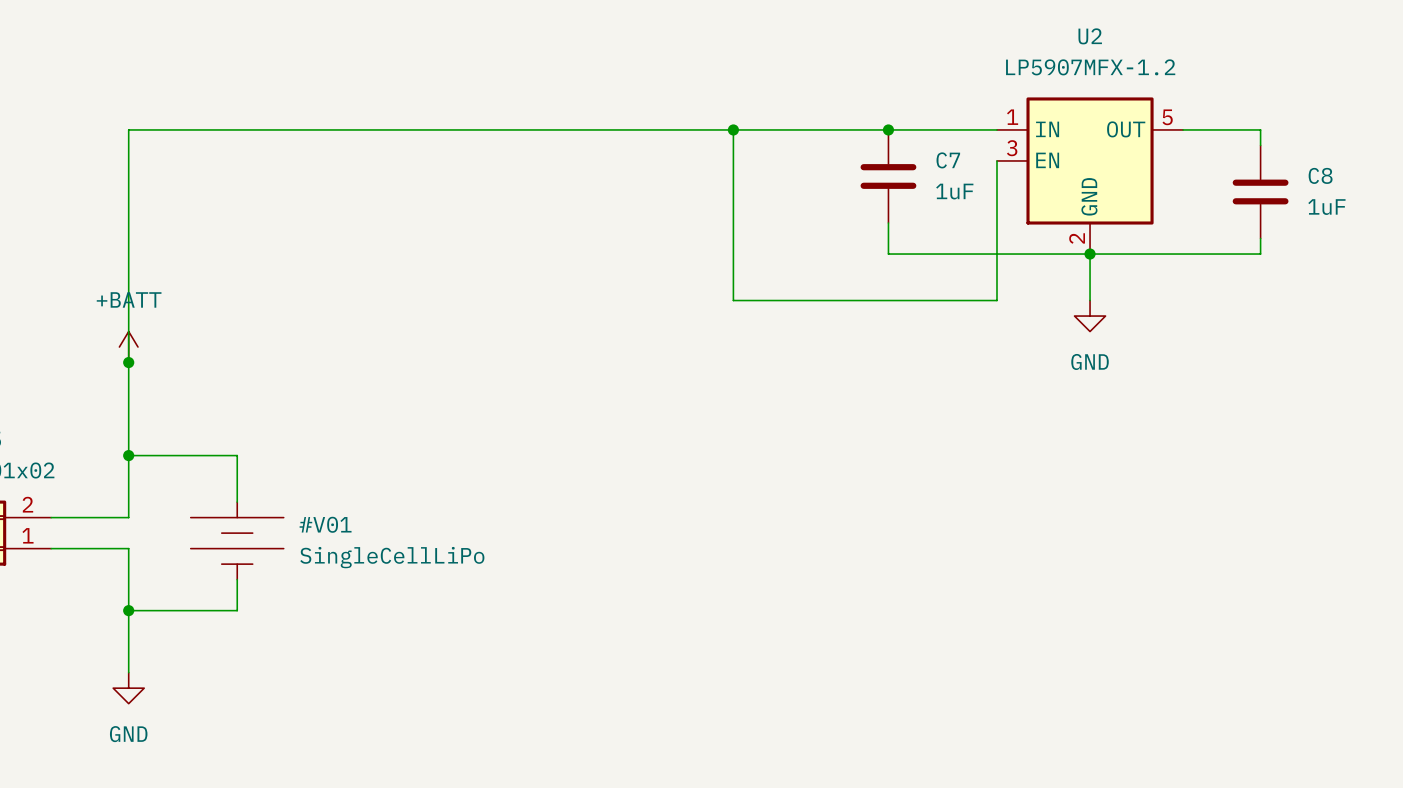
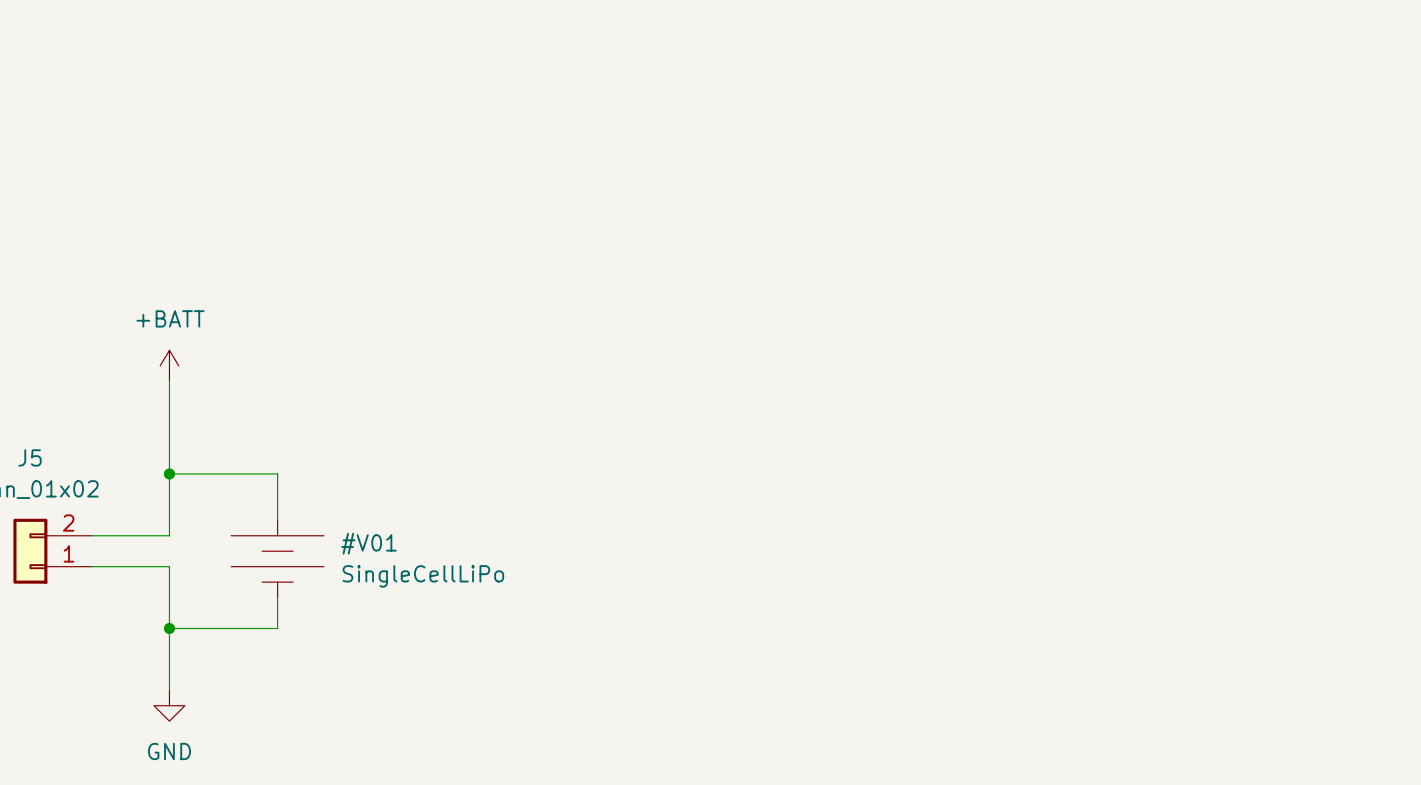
wire: (733, 129) (733, 300) (996, 300) (996, 160) -> none
junction: (733, 129) -> none
junction: (888, 129) -> none
wire: (996, 129) (128, 129) (128, 362) -> none
wire: (1183, 129) (1260, 129) (1260, 145) -> none
U2: LP5907MFX-1.2 (1090, 175) -> none
C7: 1uF (888, 176) -> none
C8: 1uF (1260, 191) -> none
wire: (888, 223) (888, 254) (1260, 254) (1260, 238) -> none
wire: (1090, 254) (1090, 300) -> none
junction: (1090, 254) -> none
power symbol: GND (1090, 316) -> none
junction: (128, 362) -> none

